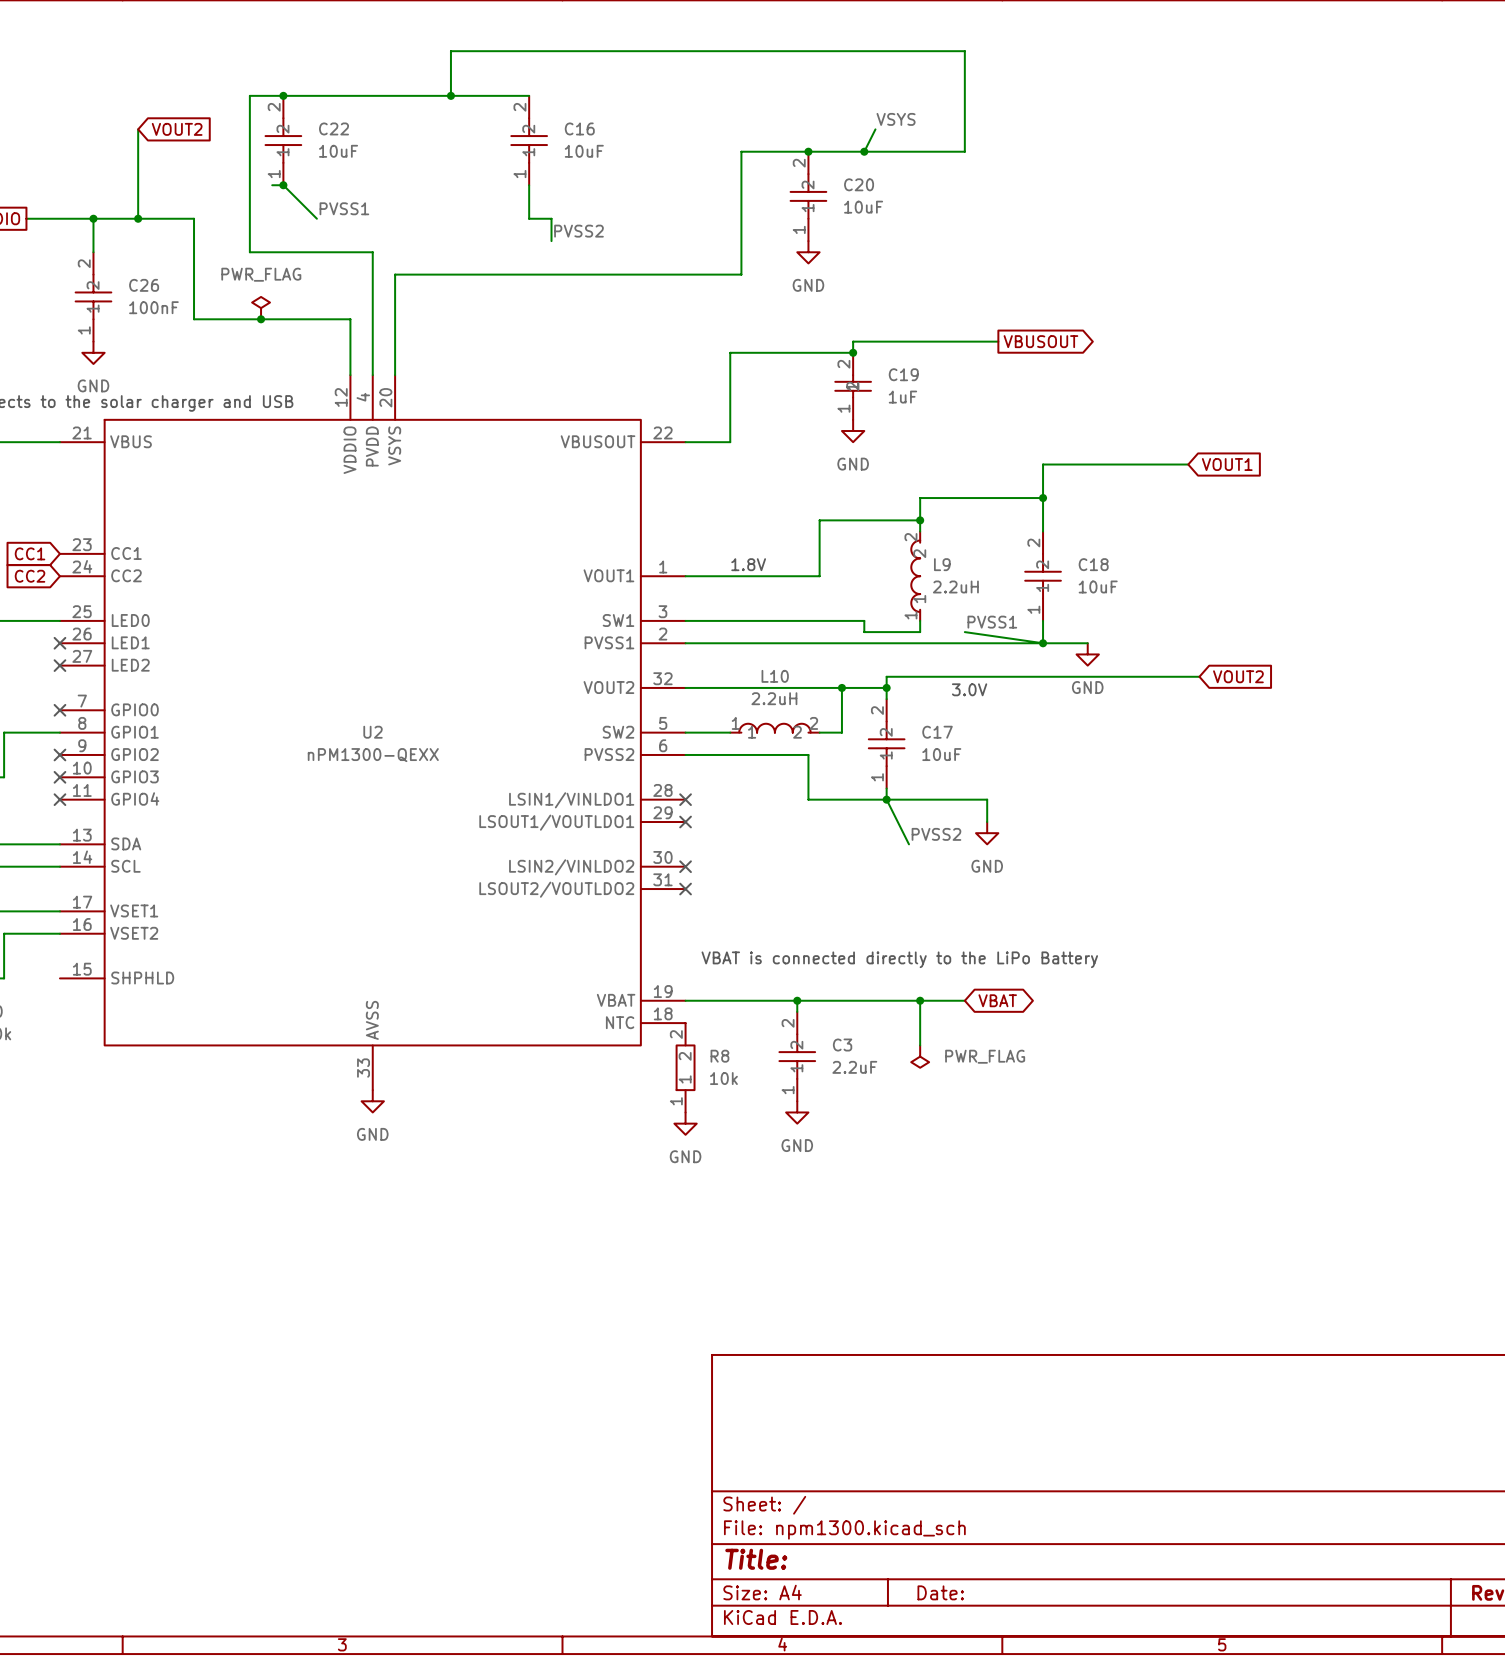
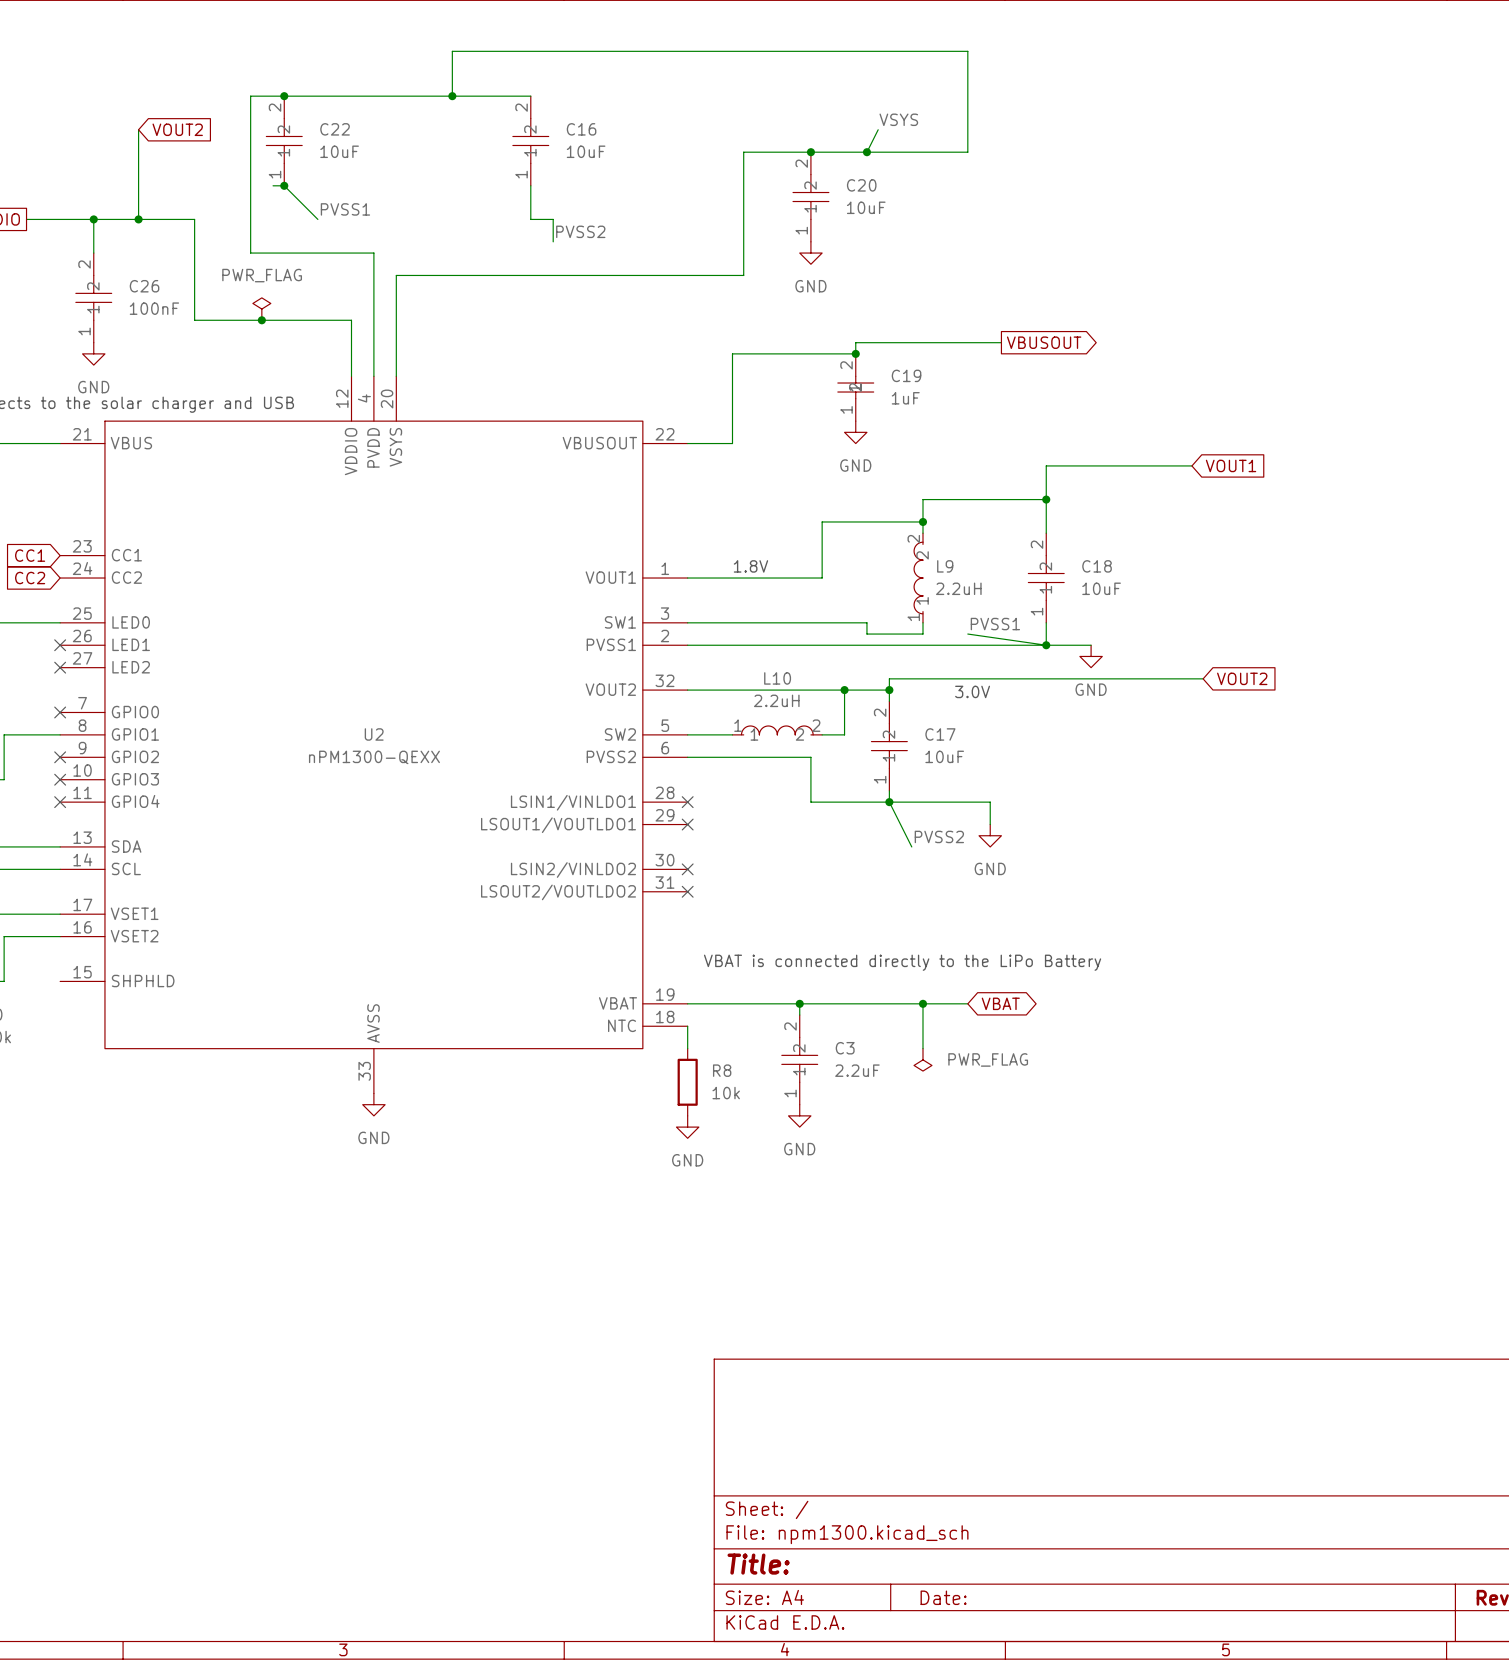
R8 symbol: [676, 1023, 695, 1113] -> [677, 1048, 698, 1116]

